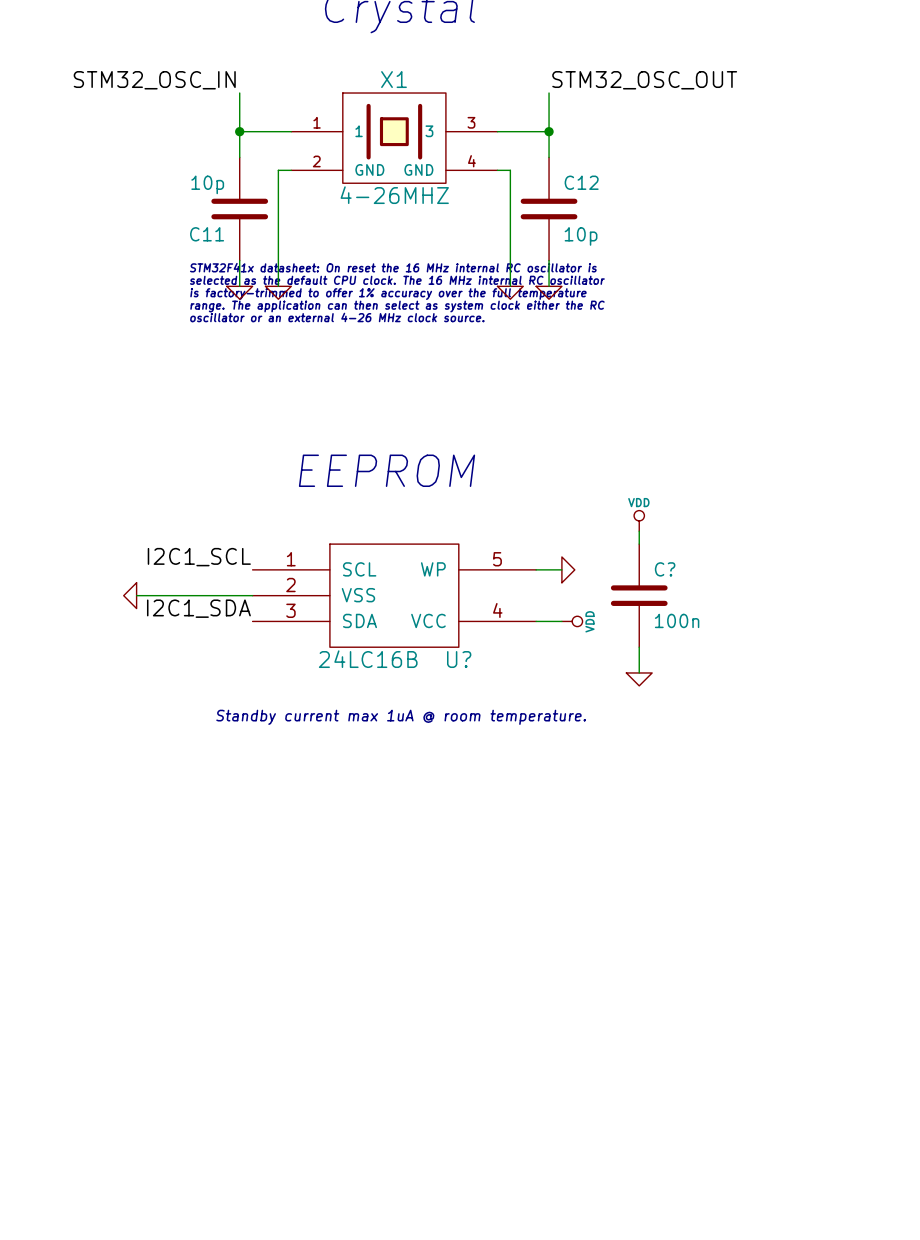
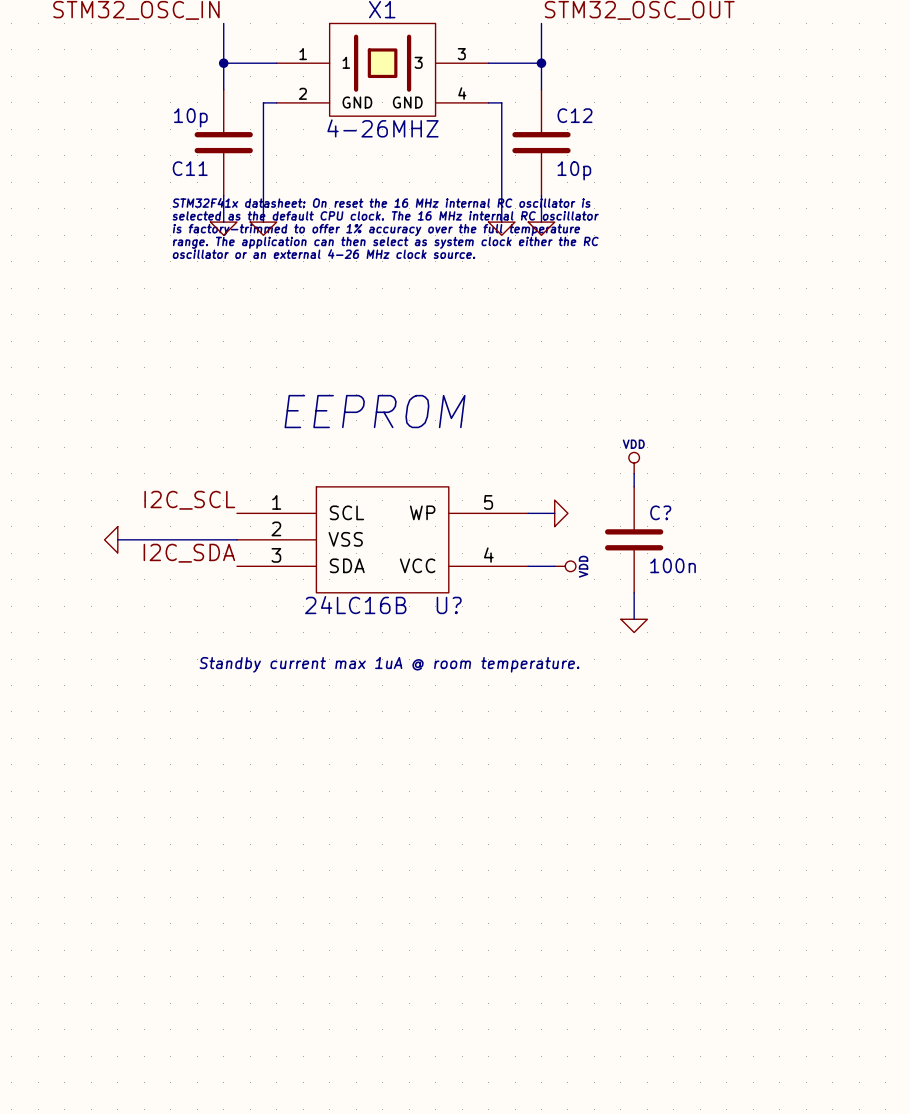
label: I2C1_SCL (199, 557) -> I2C_SCL (189, 500)
label: I2C1_SDA (198, 608) -> I2C_SDA (189, 553)

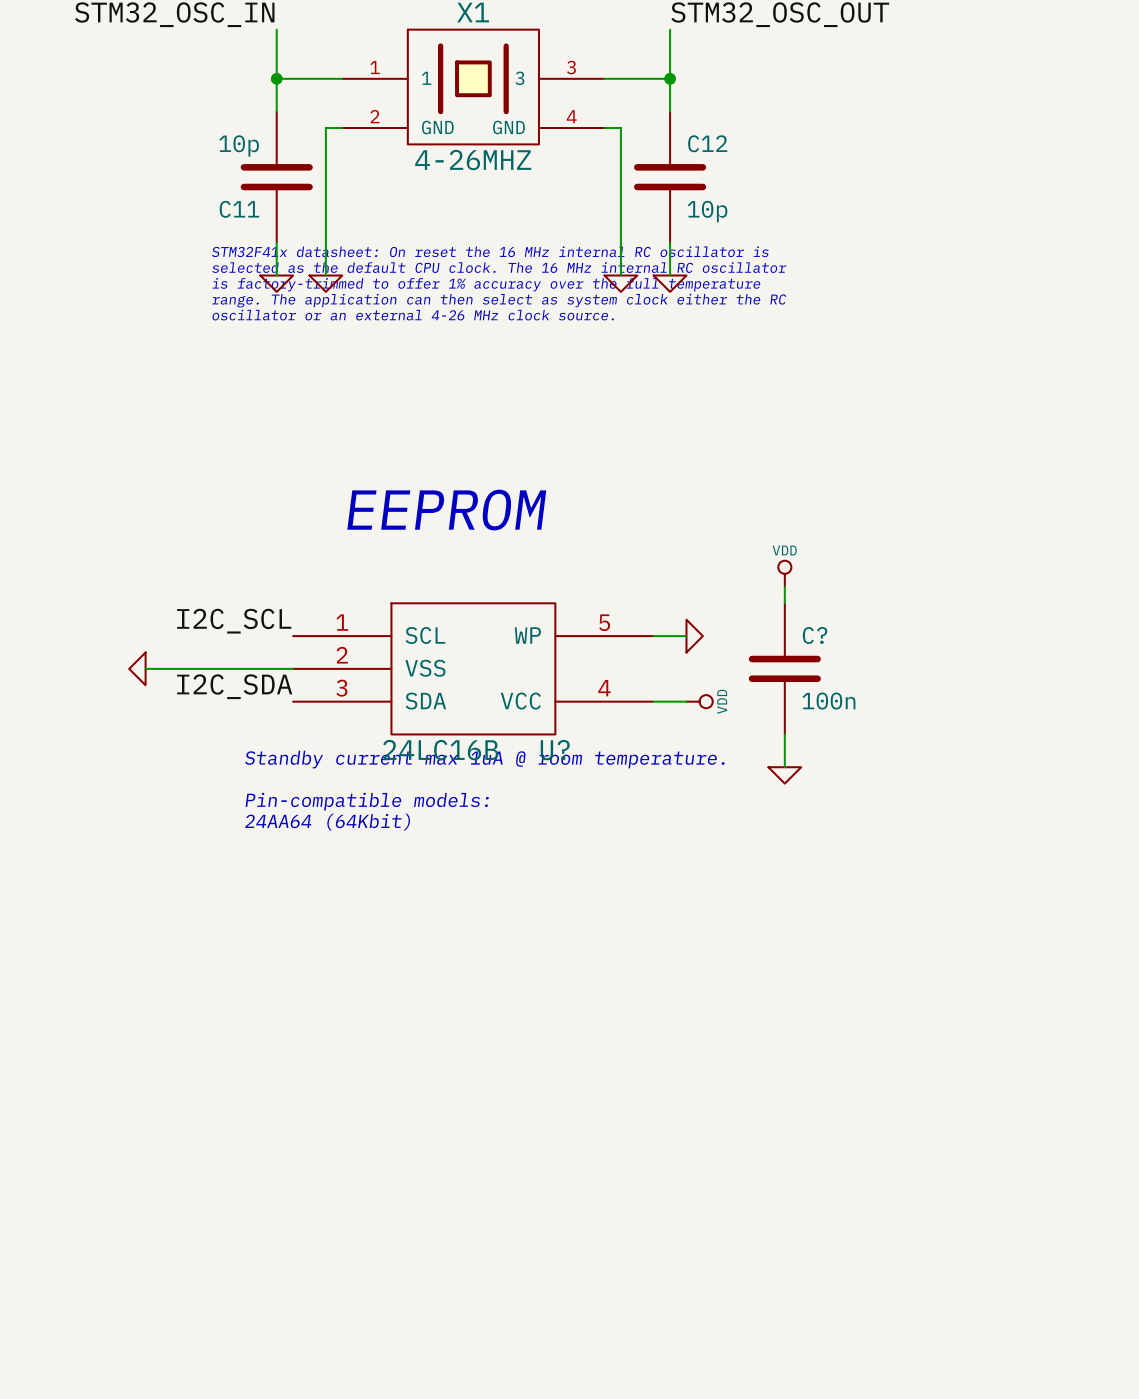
text: none -> Standby current max 1uA @ room temperature. (484, 759)
text: none -> Pin-compatible models: (367, 801)
text: Standby current max 1uA @ room temperature. (389, 664) -> 24AA64 (64Kbit) (327, 822)

